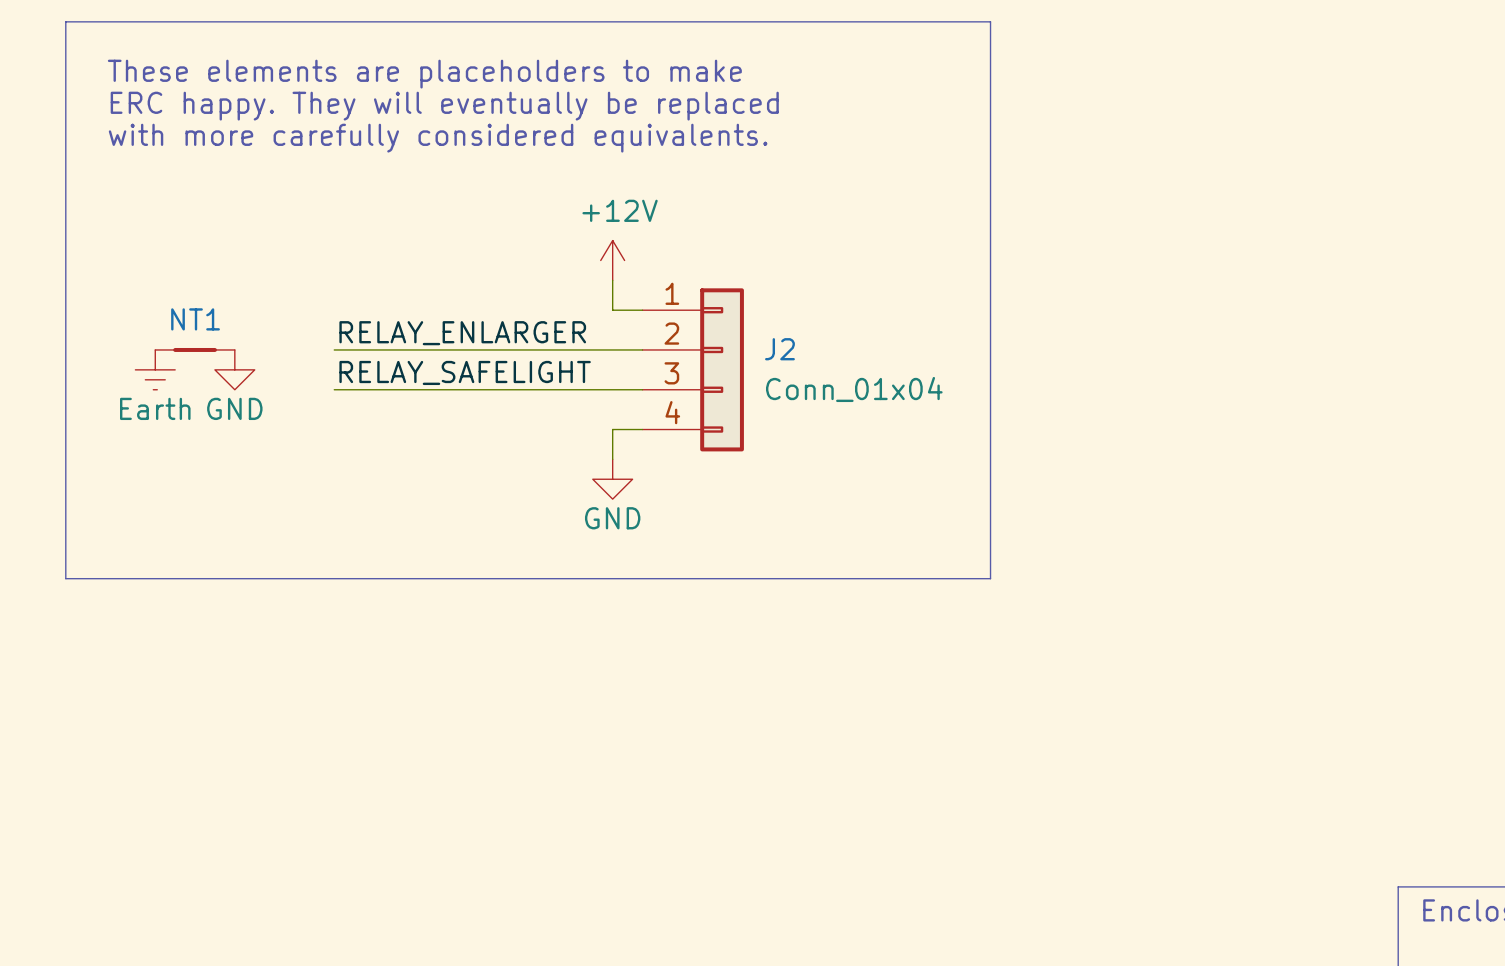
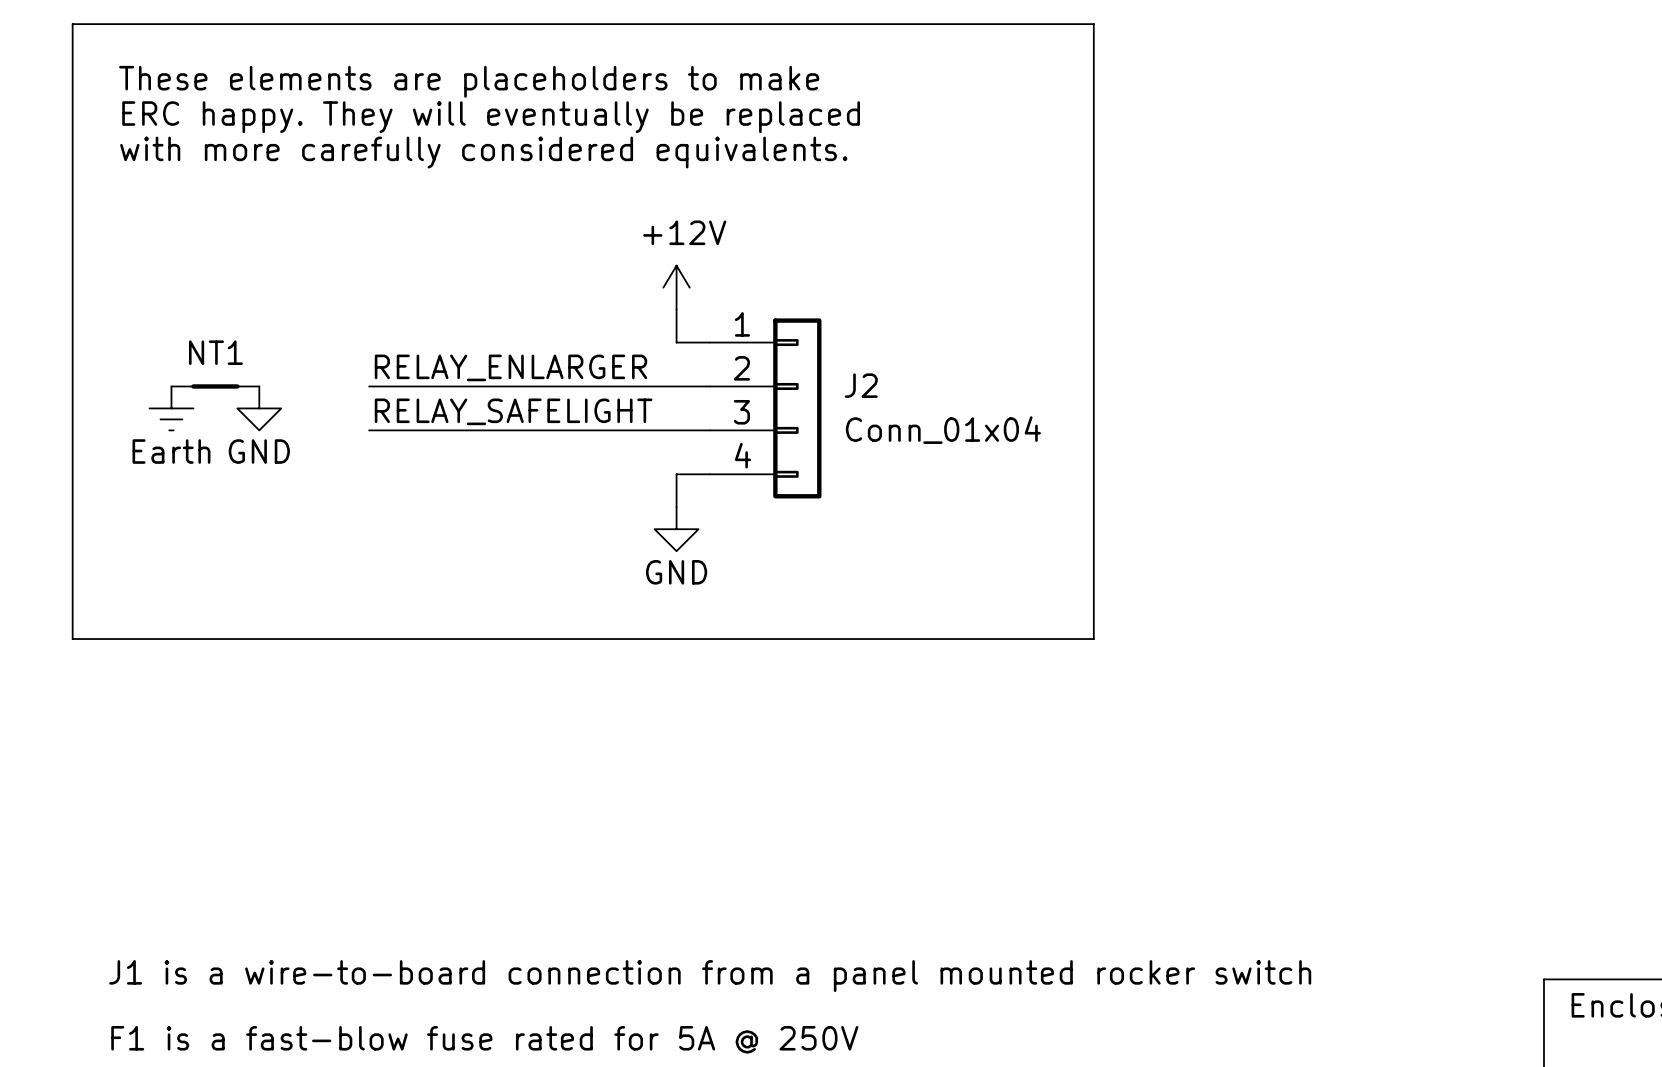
text: none -> J1 is a wire-to-board connection from a panel mounted rocker switch (710, 976)
text: none -> F1 is a fast-blow fuse rated for 5A @ 250V (484, 1039)

